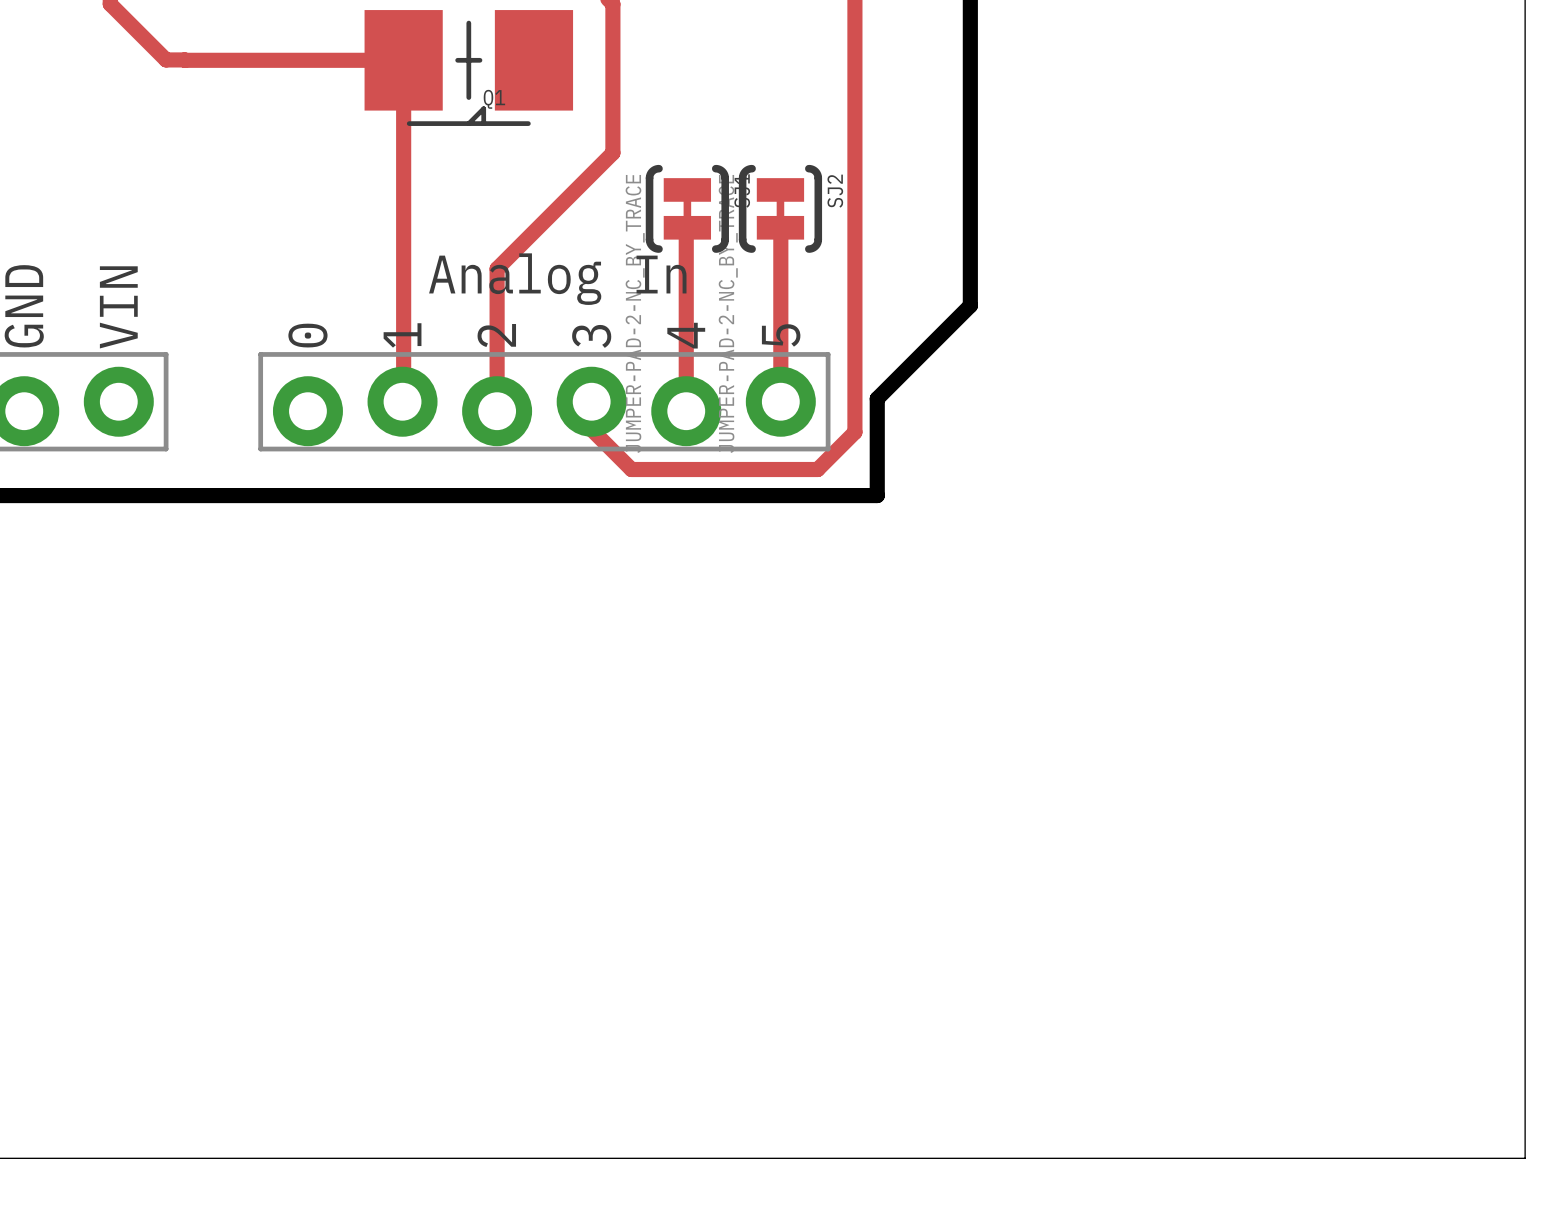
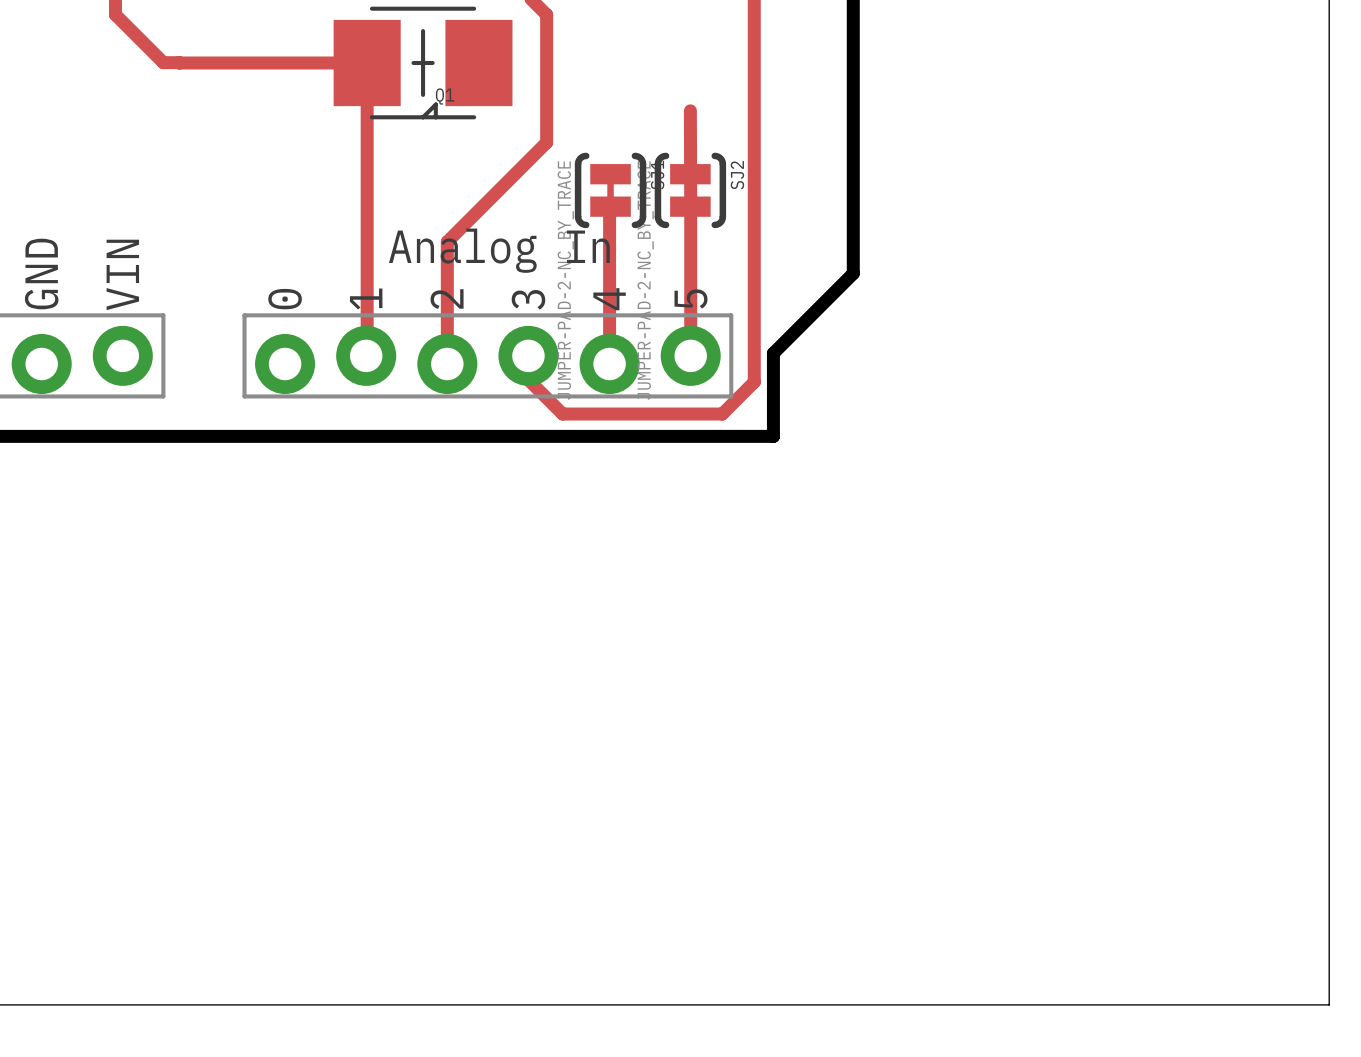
track: none -> (690, 110) (690, 206)

